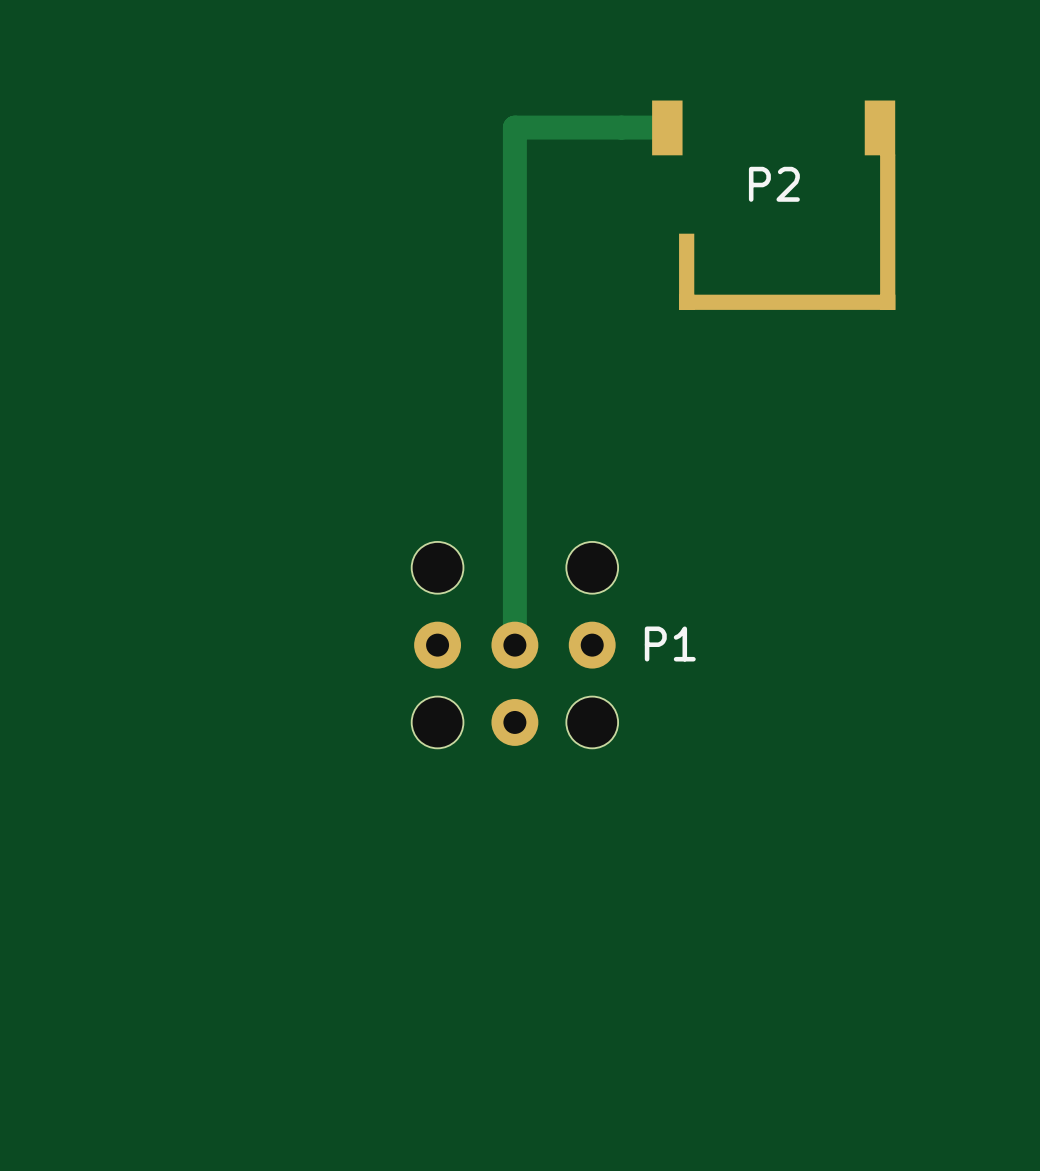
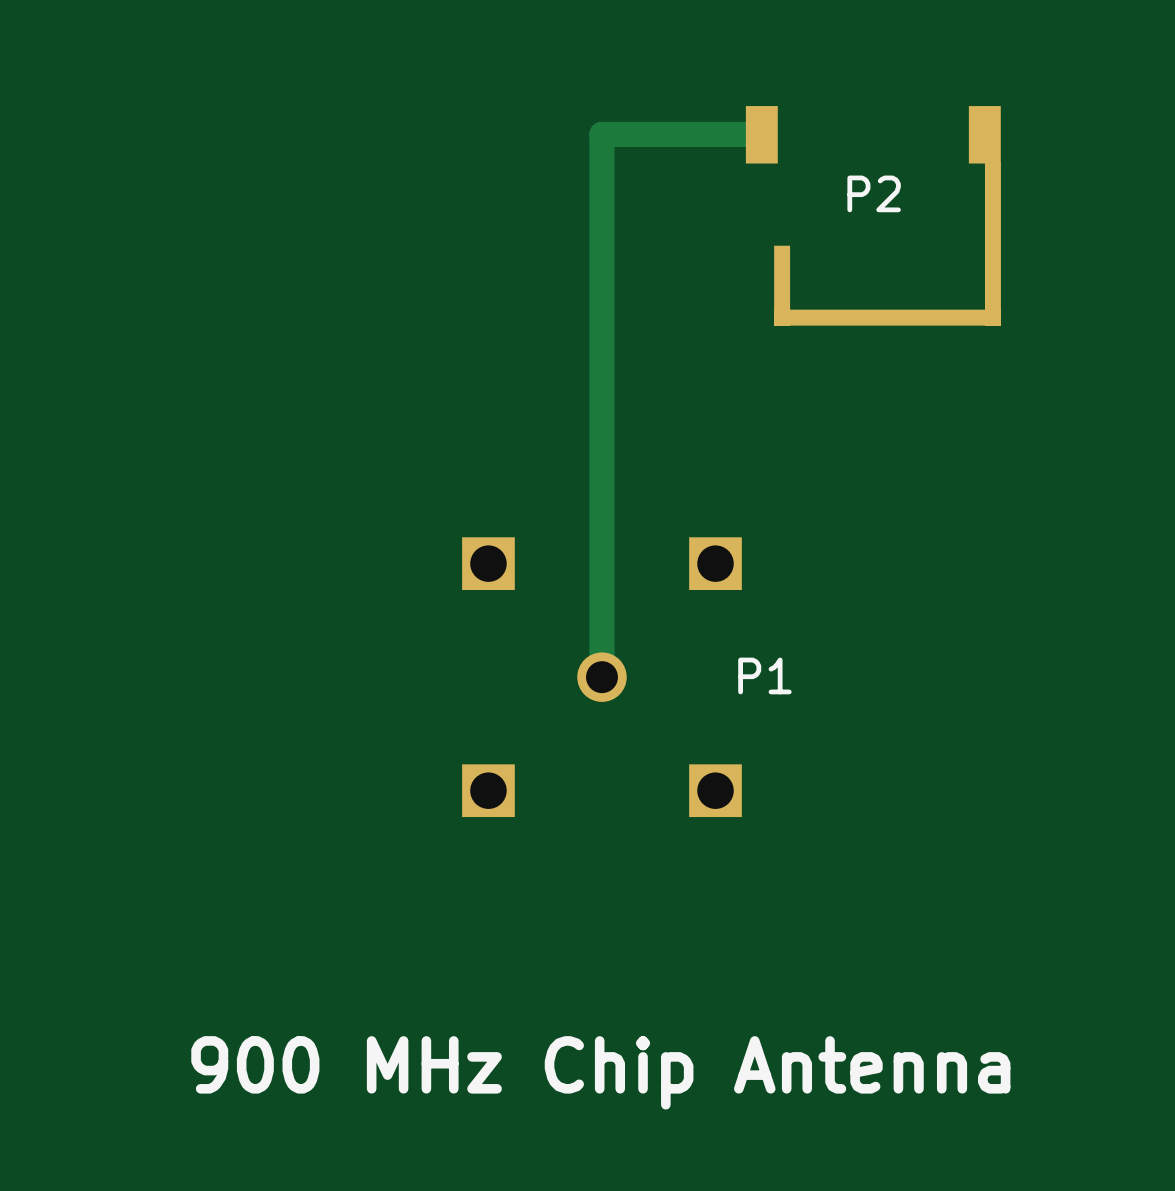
P1 footprint: [411, 541, 619, 749] -> [462, 537, 742, 818]
text: none -> 900 MHz Chip Antenna (600, 1072)

